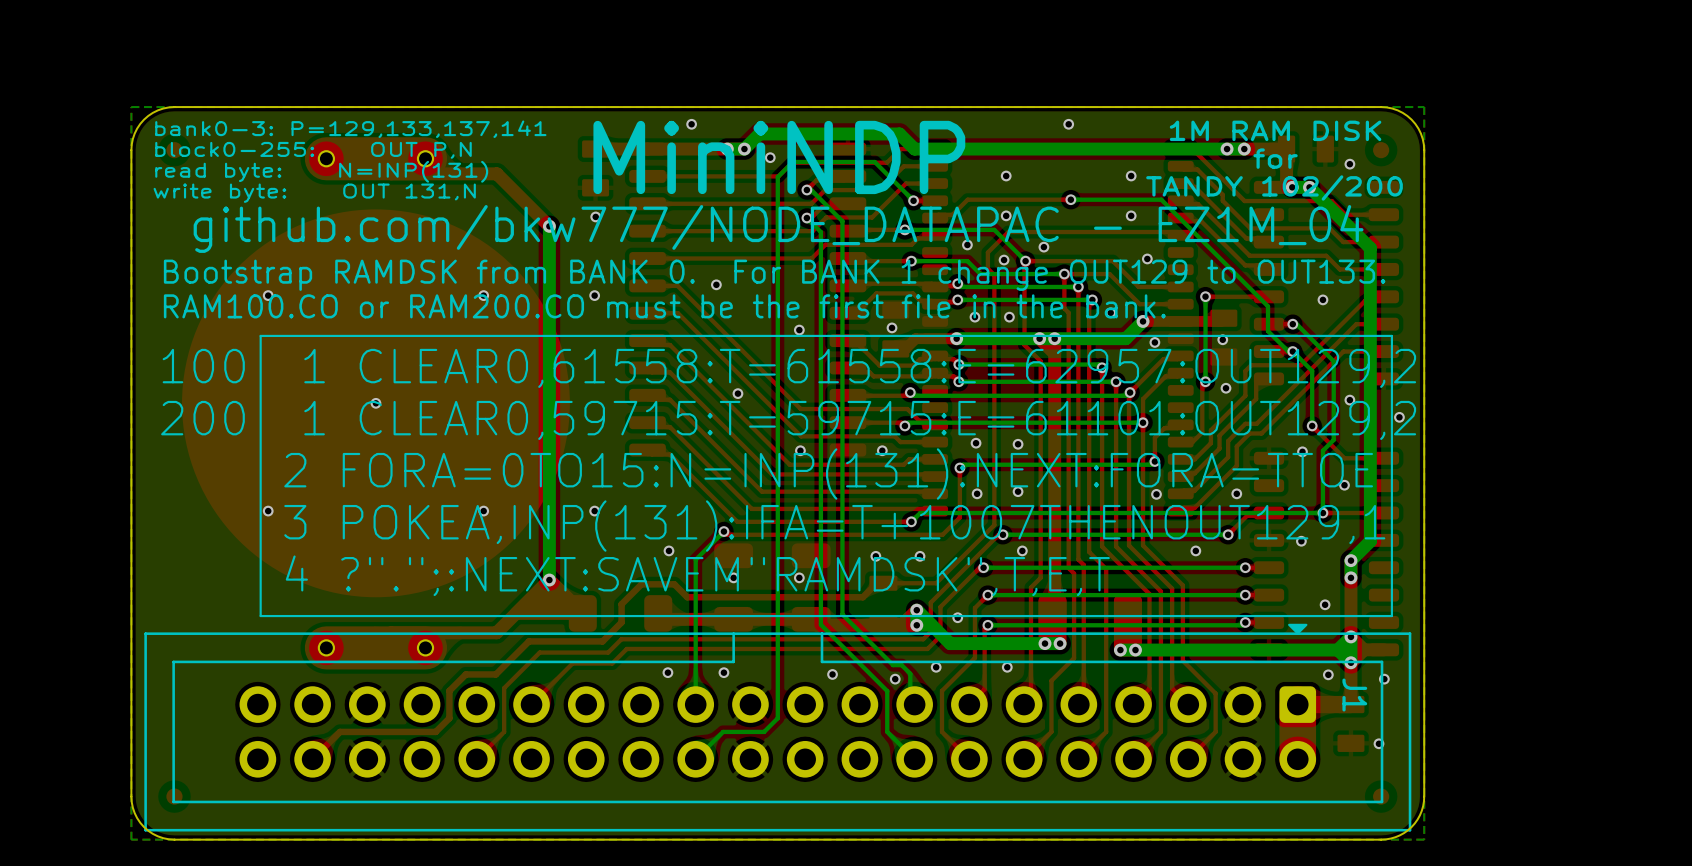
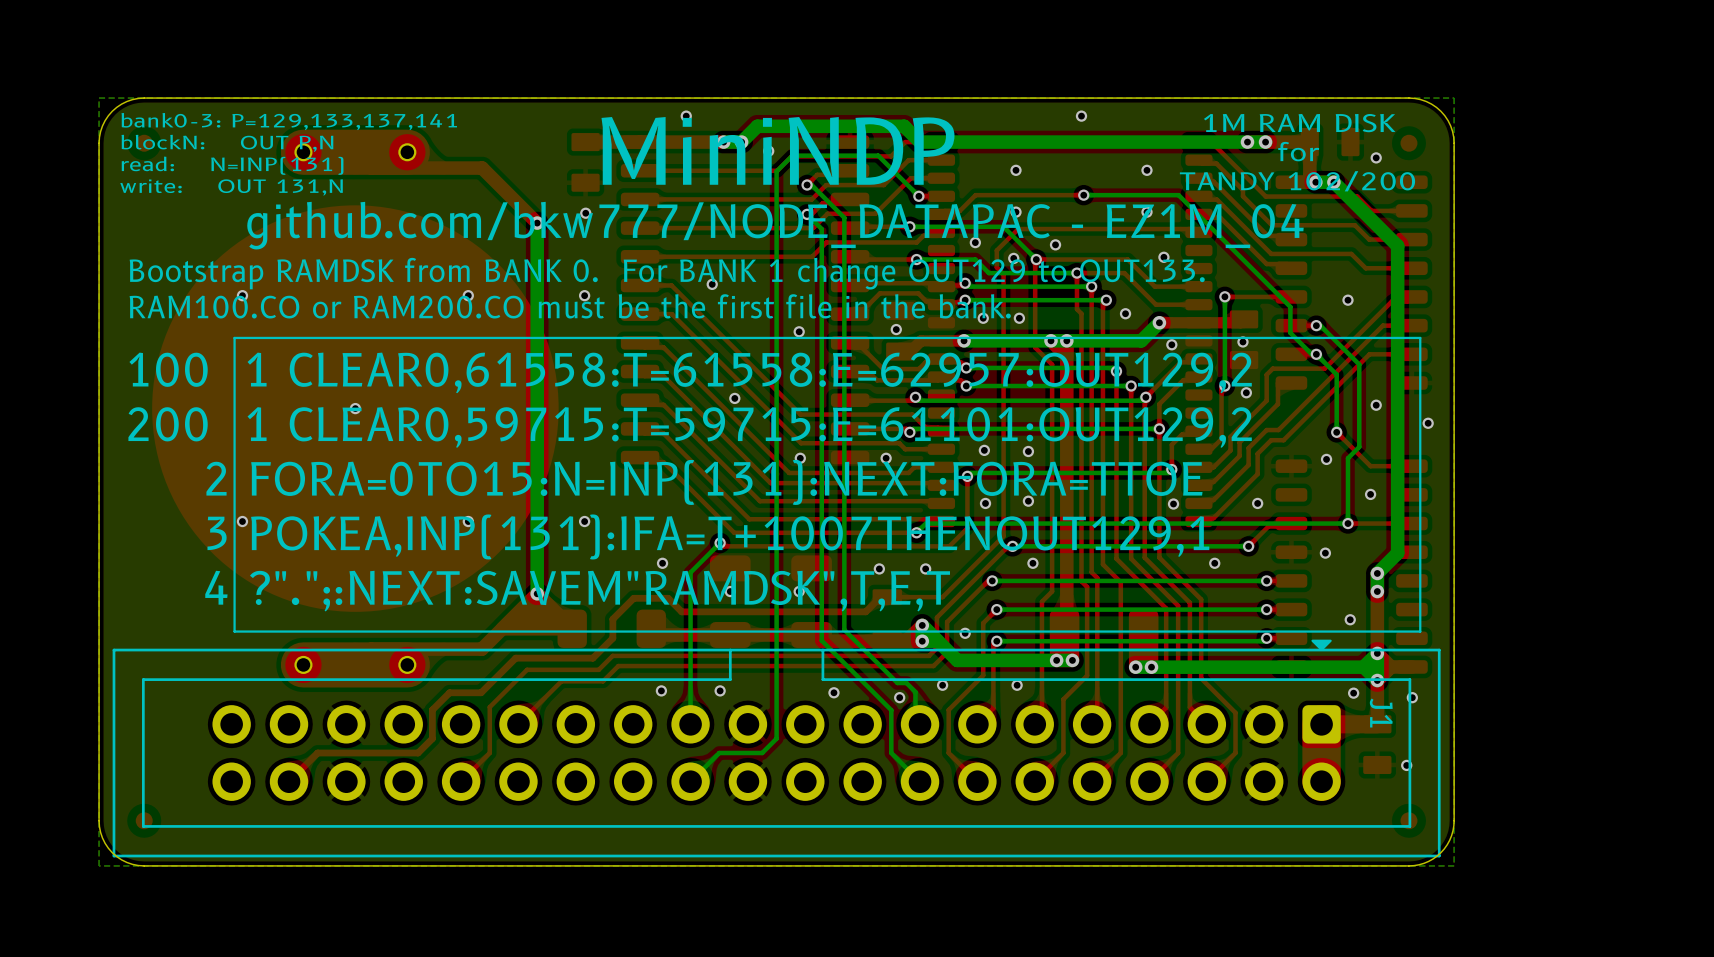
text: block0-255: OUT P,N (313, 150) -> blockN: OUT P,N (227, 143)
text: read byte: N=INP(131) (321, 171) -> read: N=INP(131) (232, 165)
text: write byte: OUT 131,N (314, 193) -> write: OUT 131,N (231, 187)

